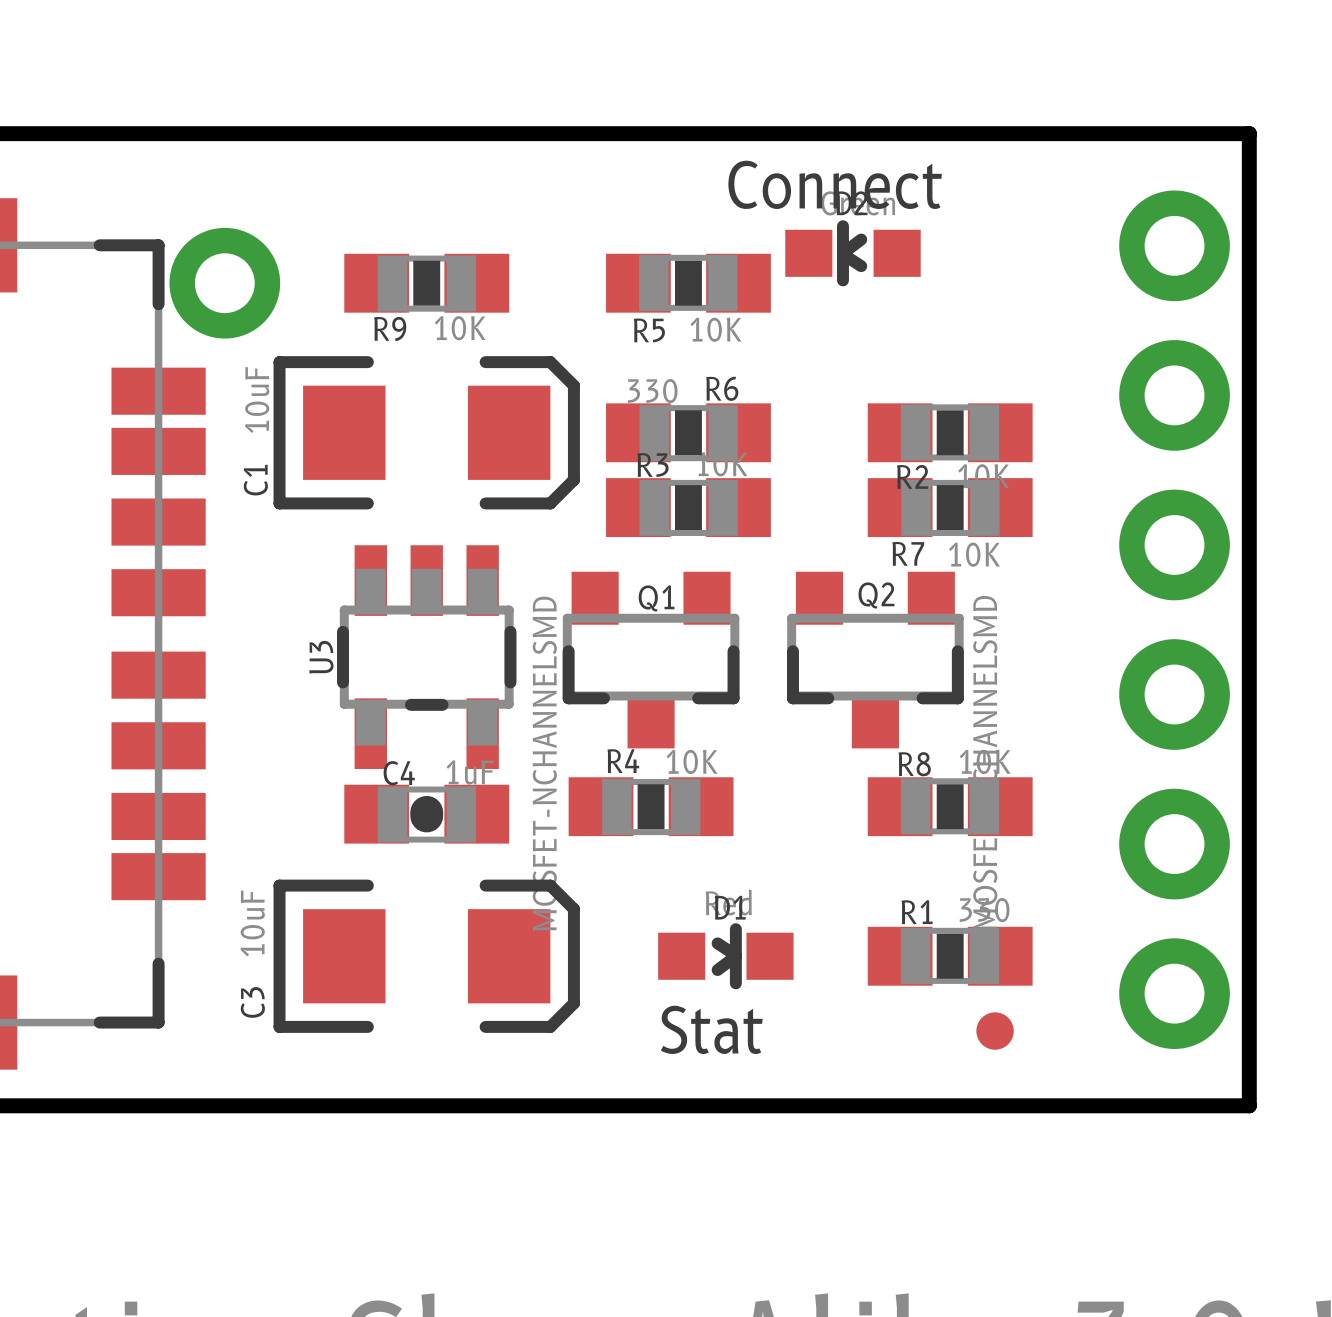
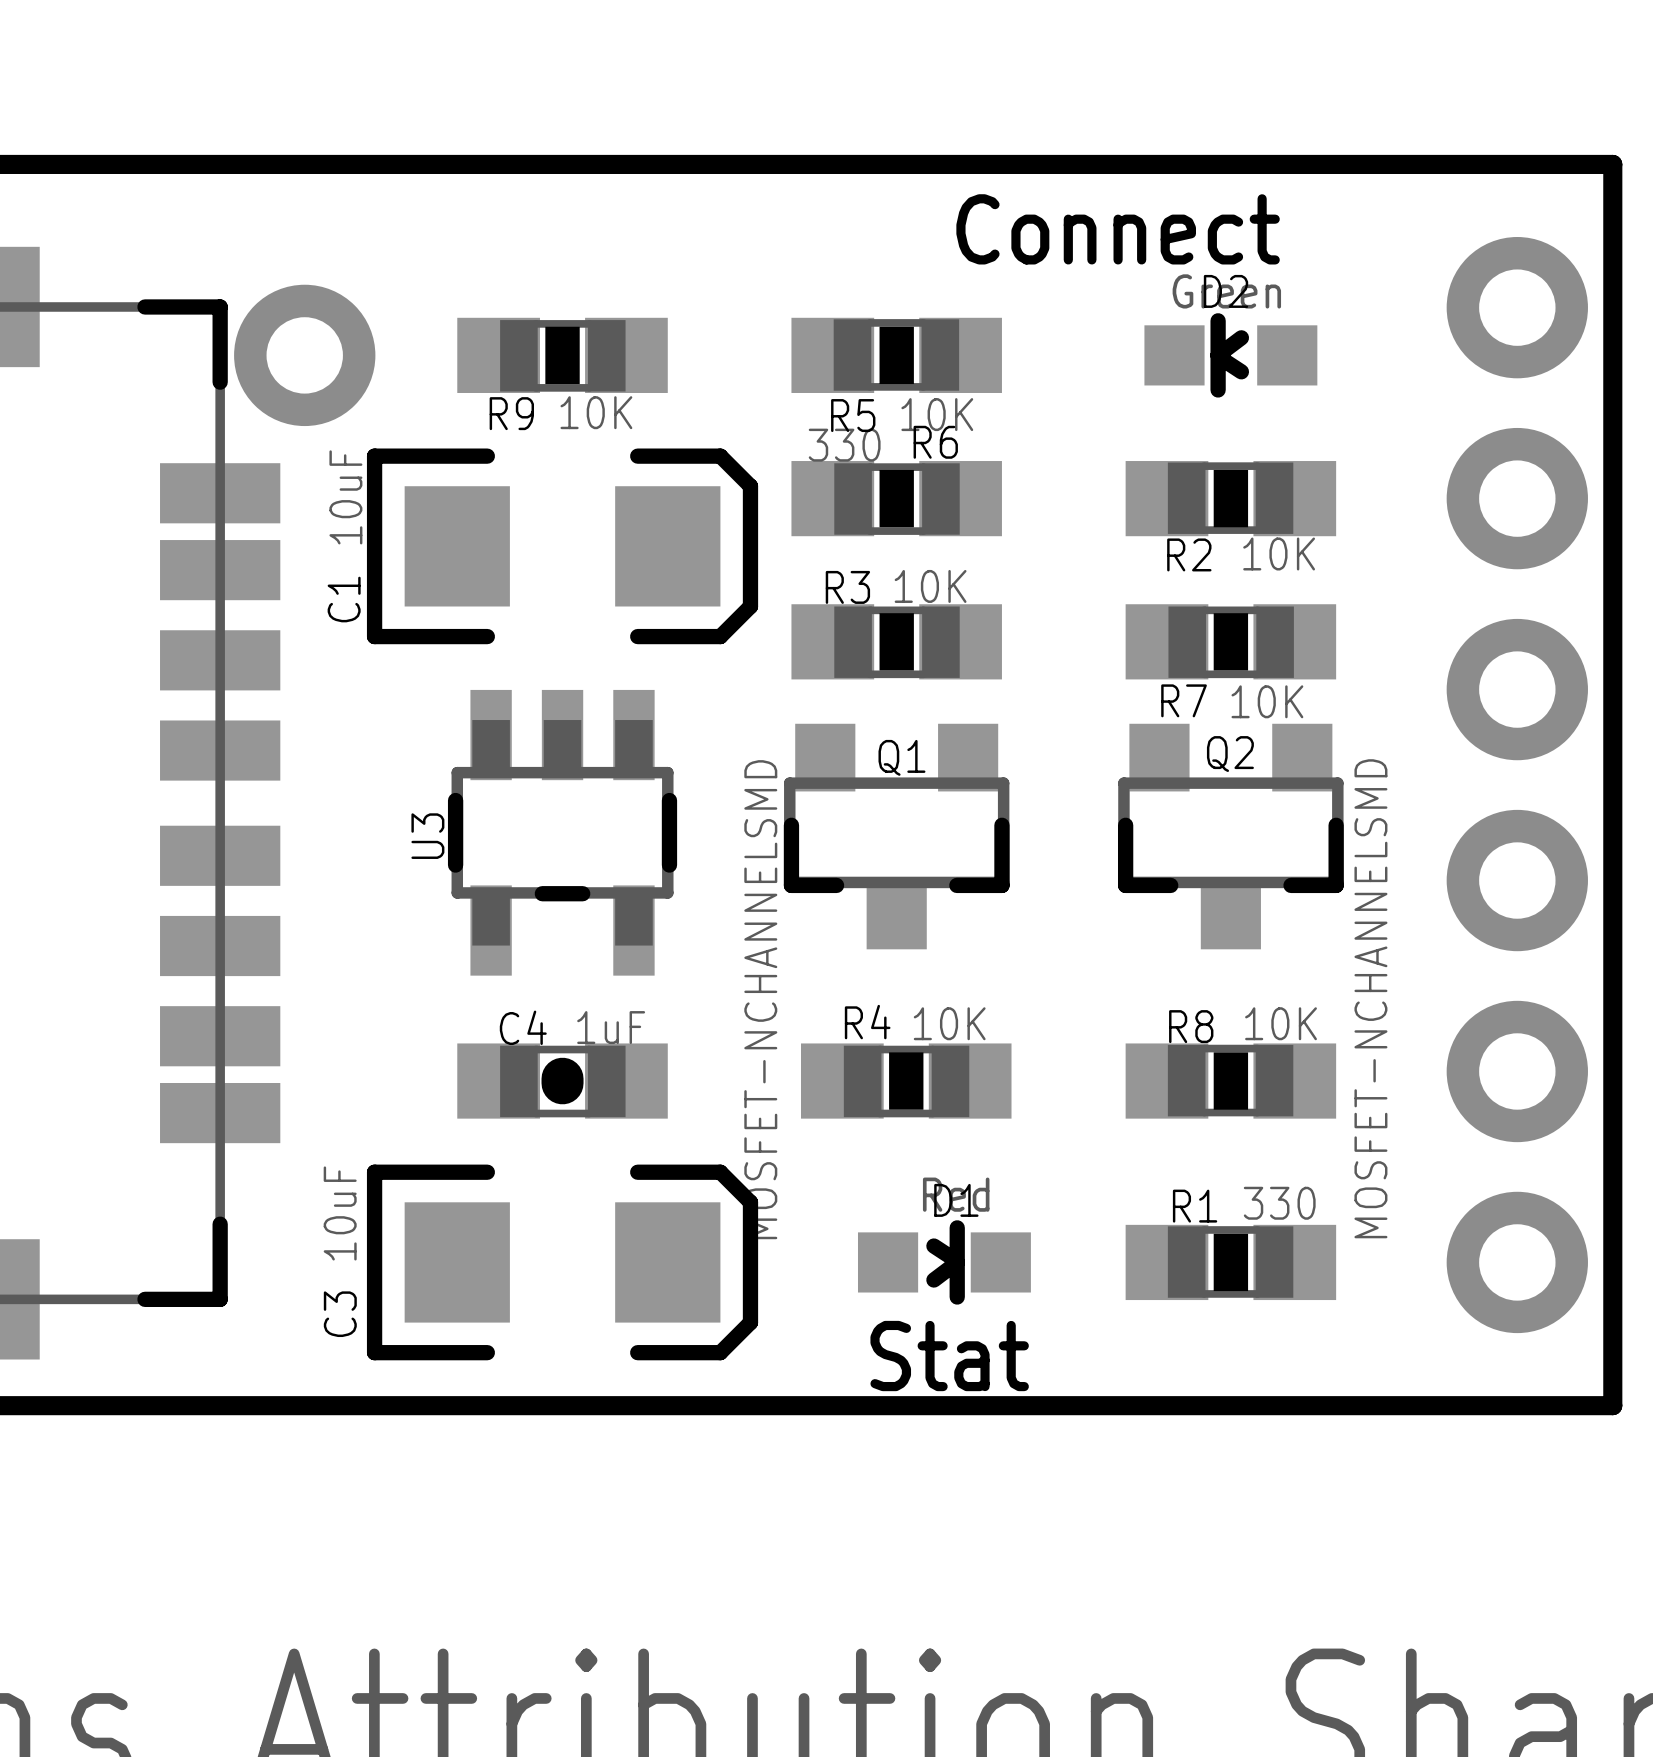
D2 position: (852, 253) -> (1230, 355)
R6 position: (688, 432) -> (896, 498)
R2 position: (950, 432) -> (1230, 498)
Q1 position: (651, 660) -> (896, 836)
Q2 position: (875, 660) -> (1230, 836)
R4 position: (651, 806) -> (906, 1081)
R8 position: (950, 806) -> (1230, 1081)
C4 position: (426, 814) -> (562, 1081)
C3 position: (426, 956) -> (562, 1262)
D1 position: (725, 956) -> (944, 1262)
R1 position: (950, 956) -> (1230, 1262)
text position: Stat (711, 1029) -> Stat (949, 1356)
part: (995, 1031) -> none

